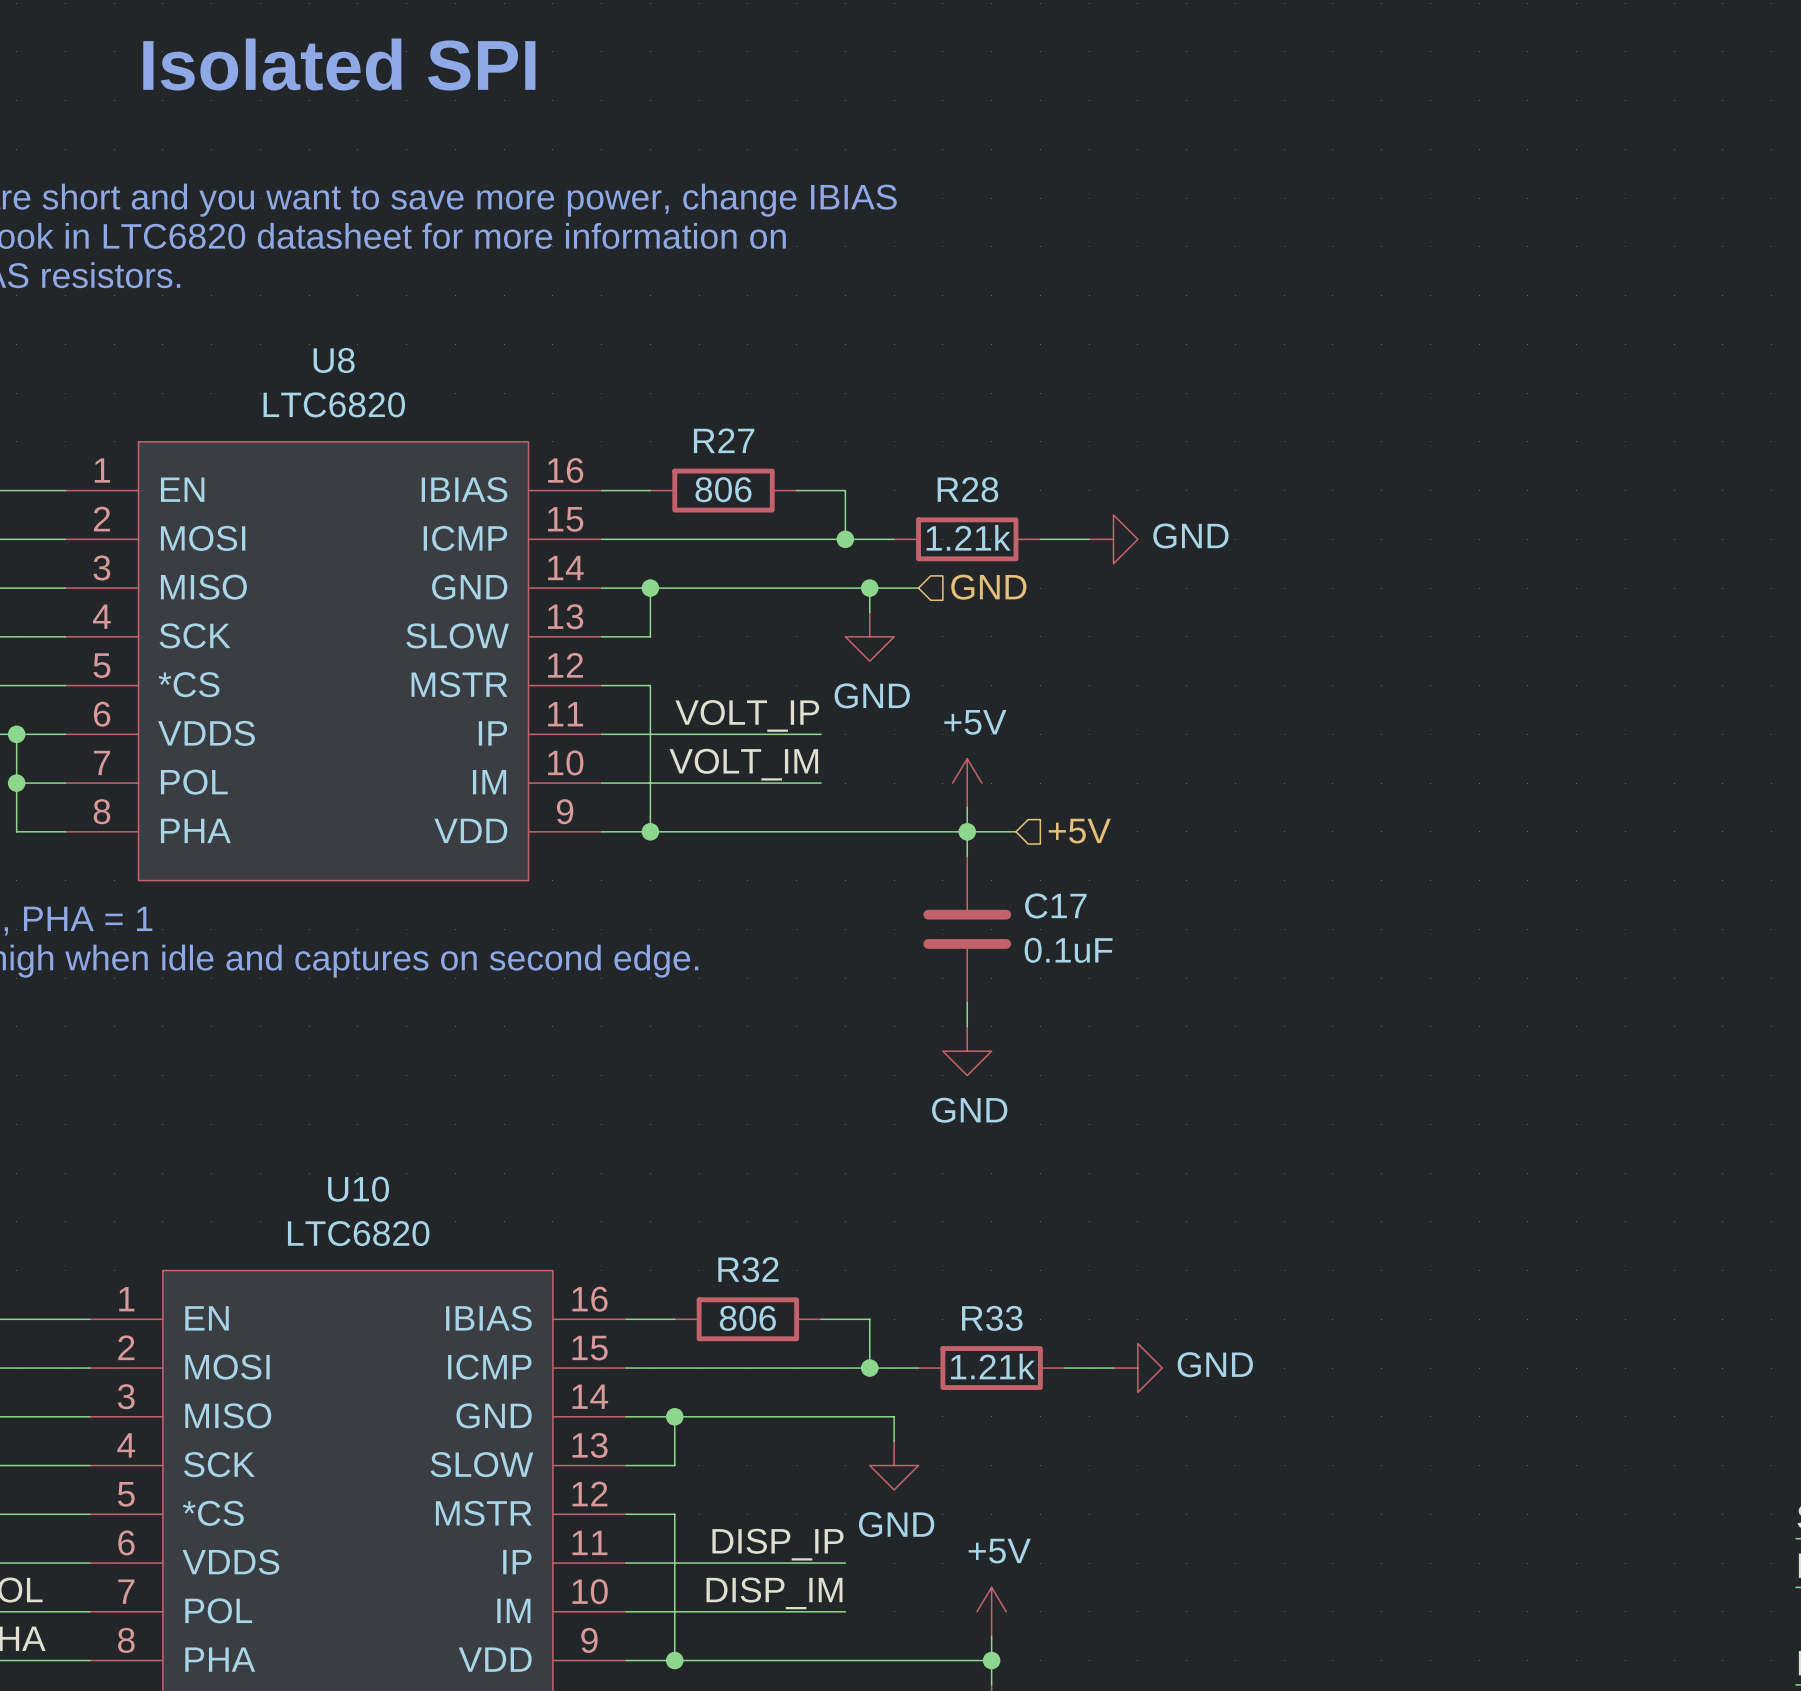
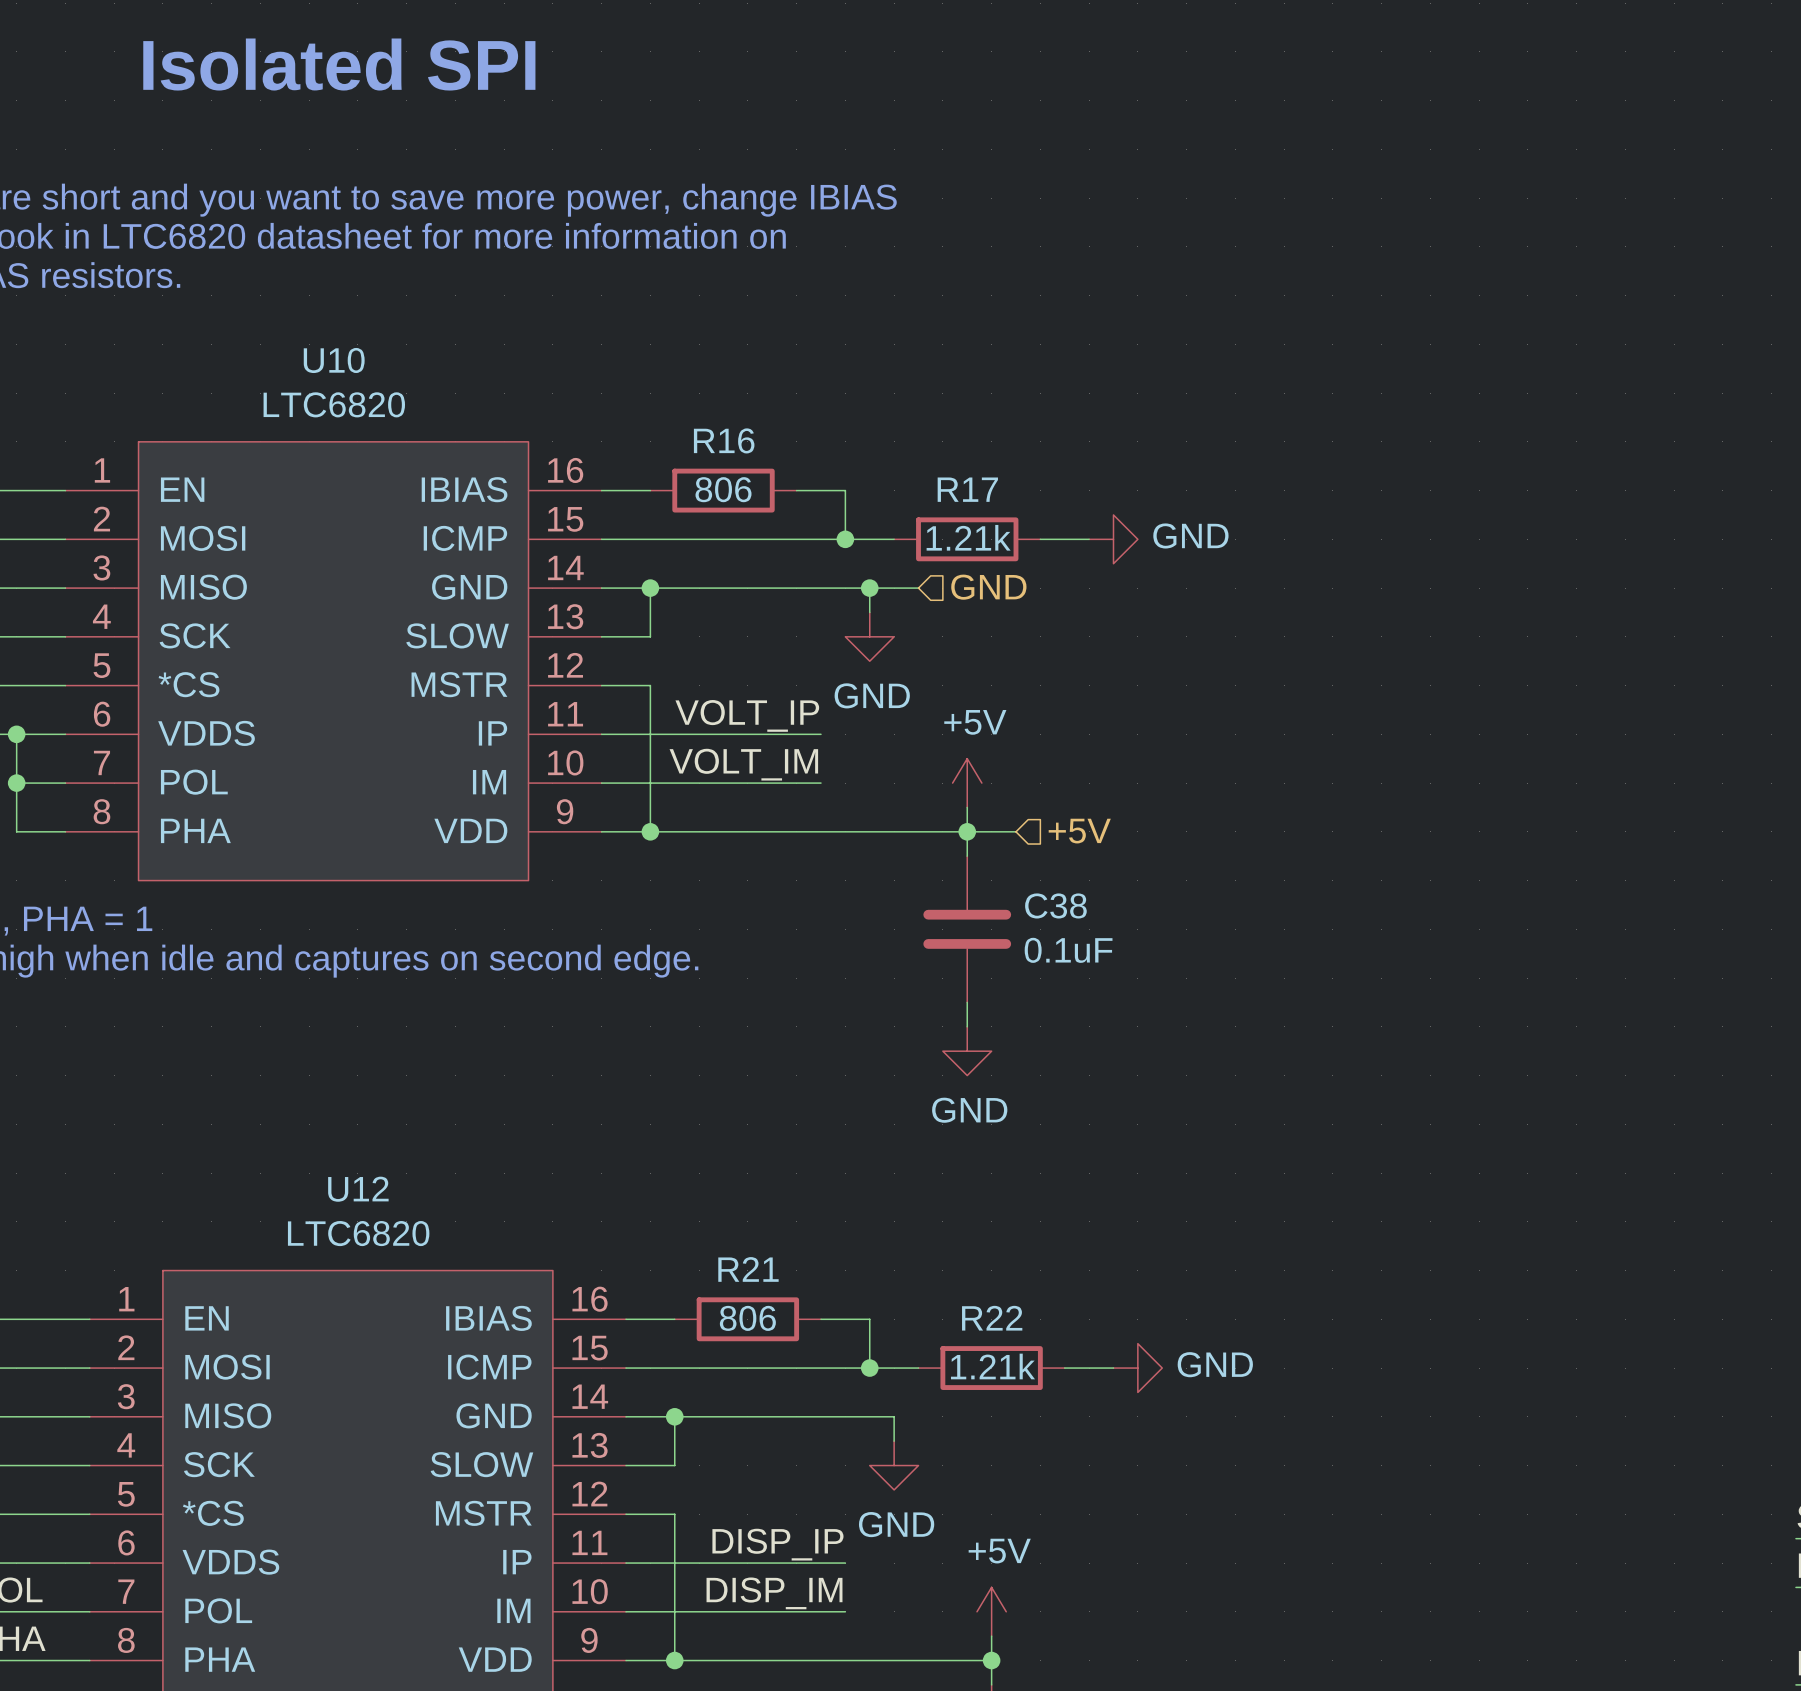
U8 name: U8 (334, 360) -> U10 (334, 360)
R27 name: R27 (724, 440) -> R16 (724, 440)
R28 name: R28 (967, 489) -> R17 (967, 489)
C17 name: C17 (1055, 905) -> C38 (1055, 905)
U10 name: U10 (358, 1189) -> U12 (358, 1189)
R32 name: R32 (748, 1269) -> R21 (748, 1269)
R33 name: R33 (992, 1318) -> R22 (992, 1318)

